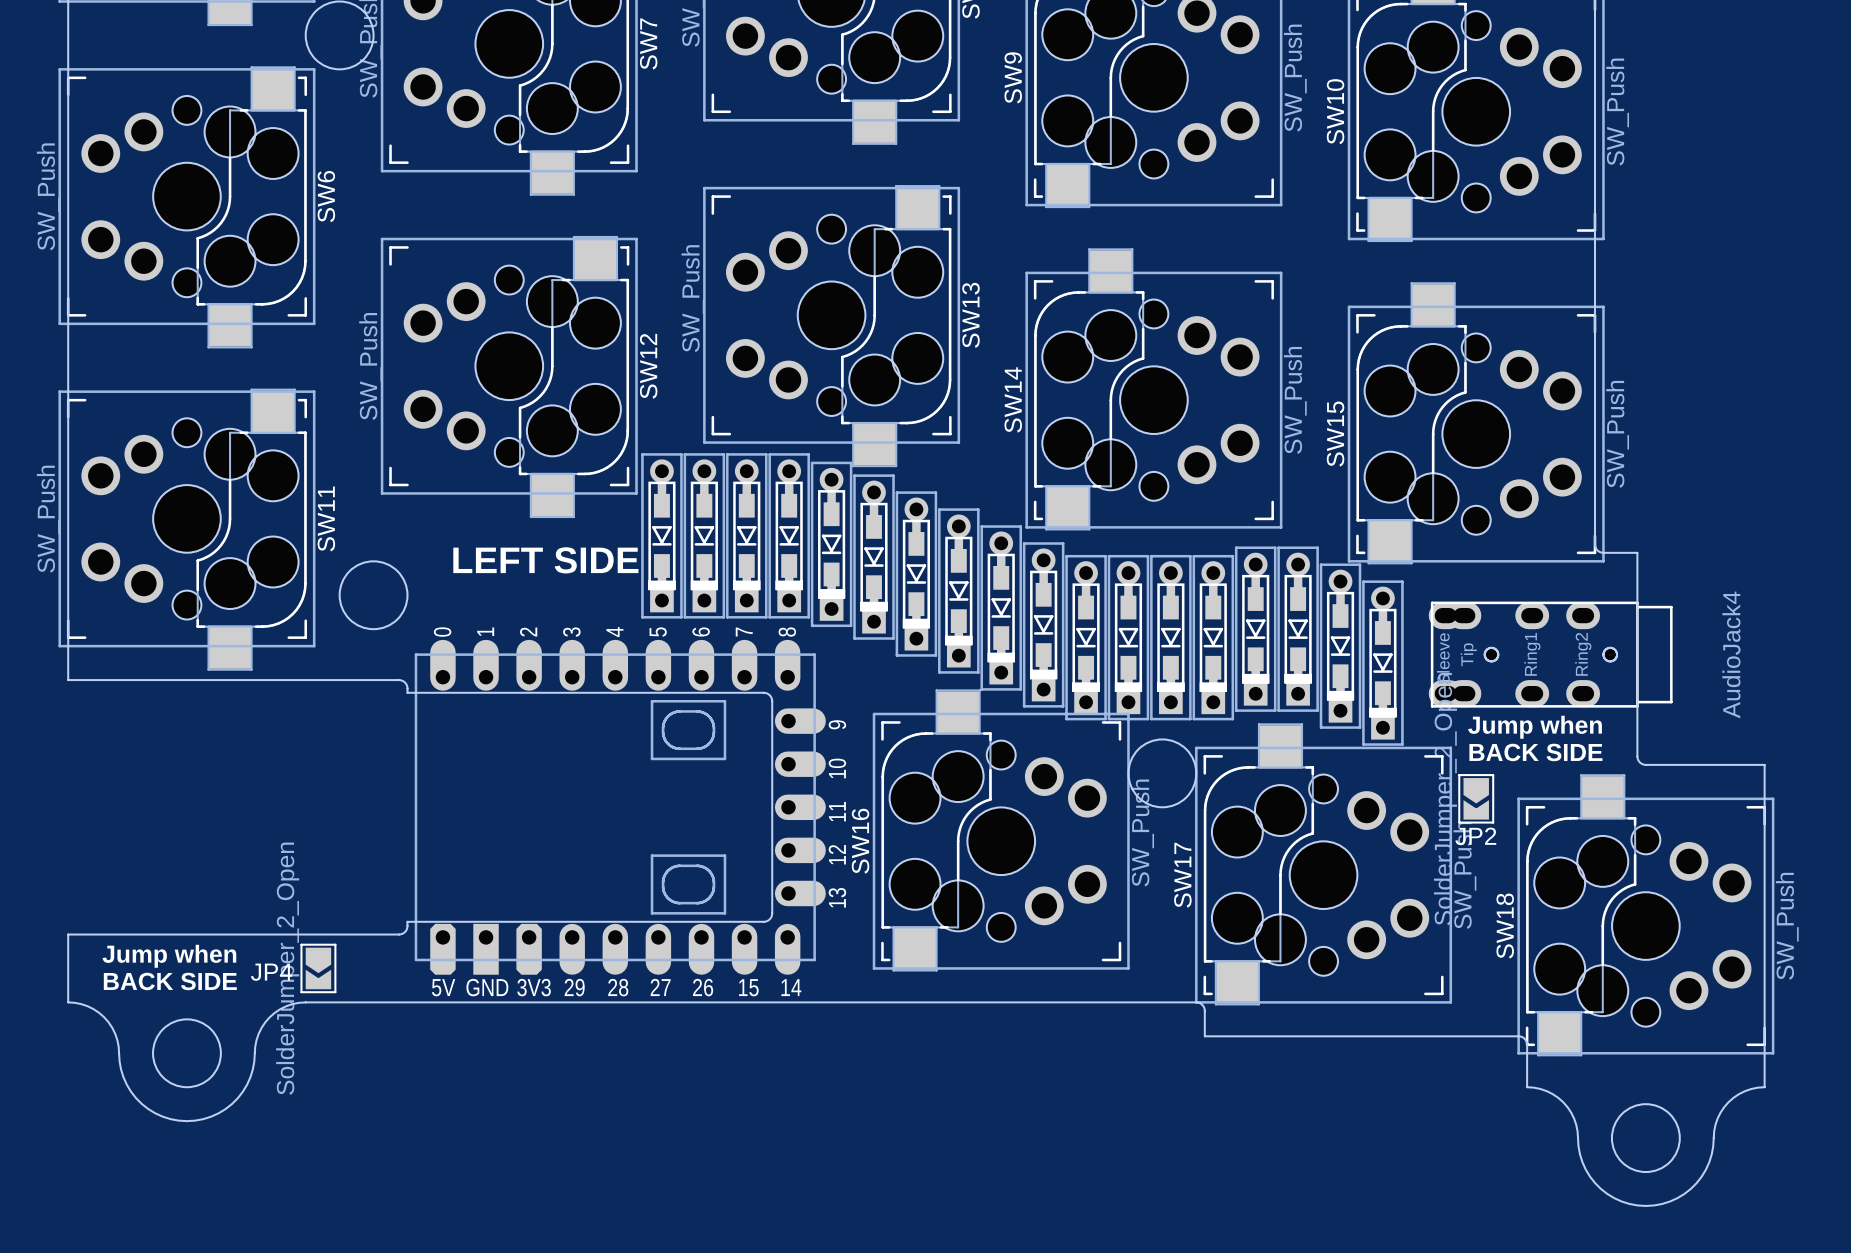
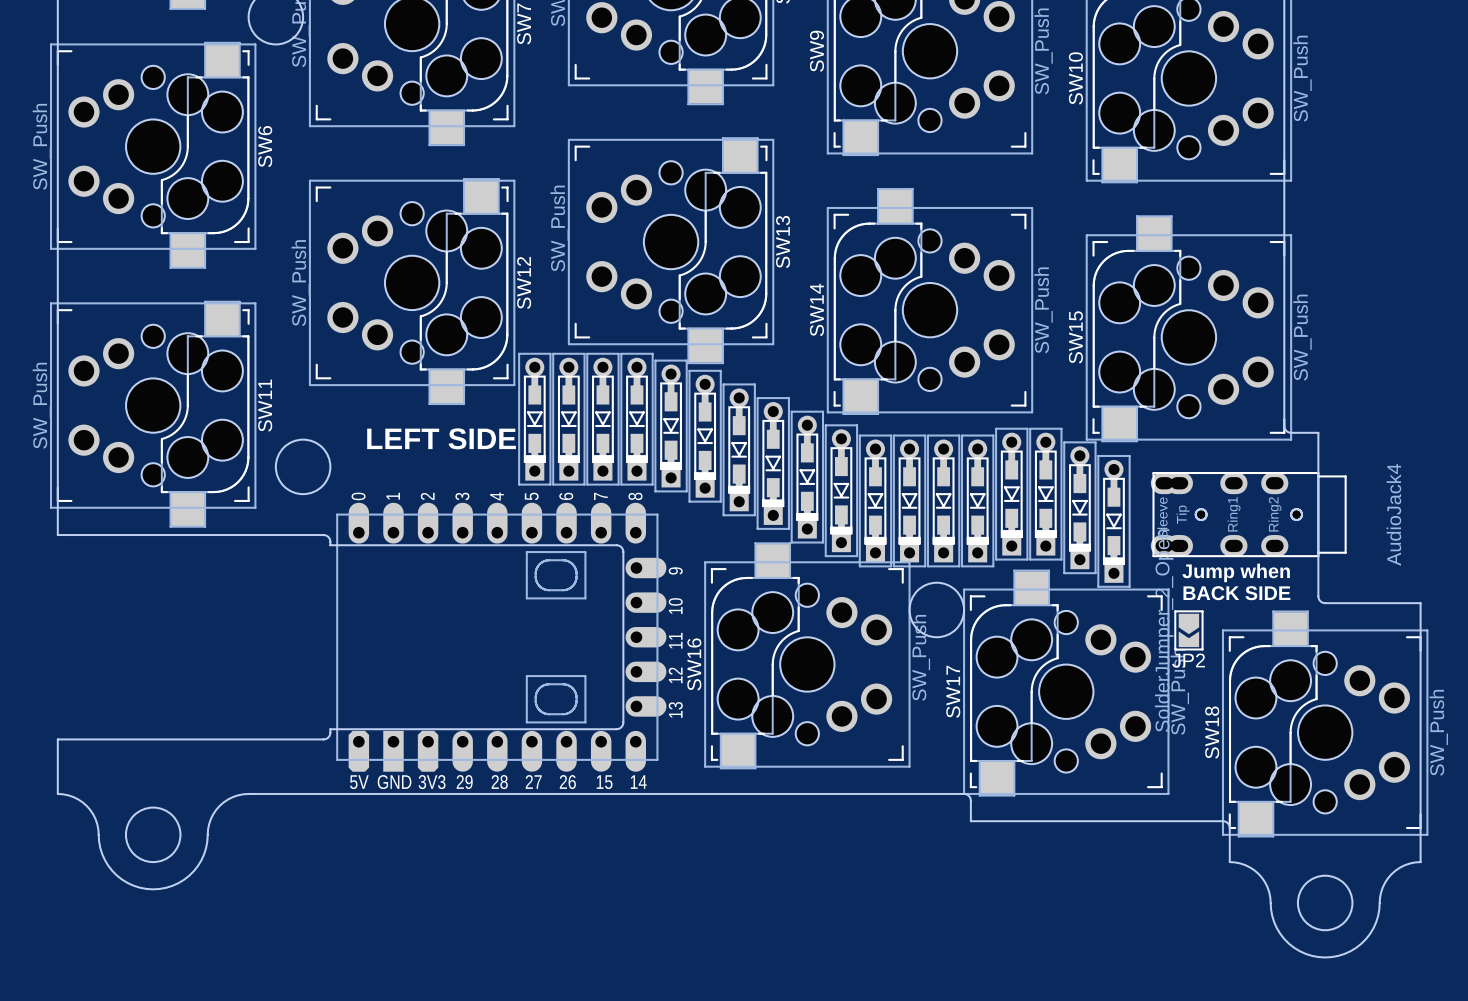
text: Jump when (169, 956) -> none
JP4: SolderJumper_2_Open (318, 968) -> none
text: BACK SIDE (170, 981) -> none

